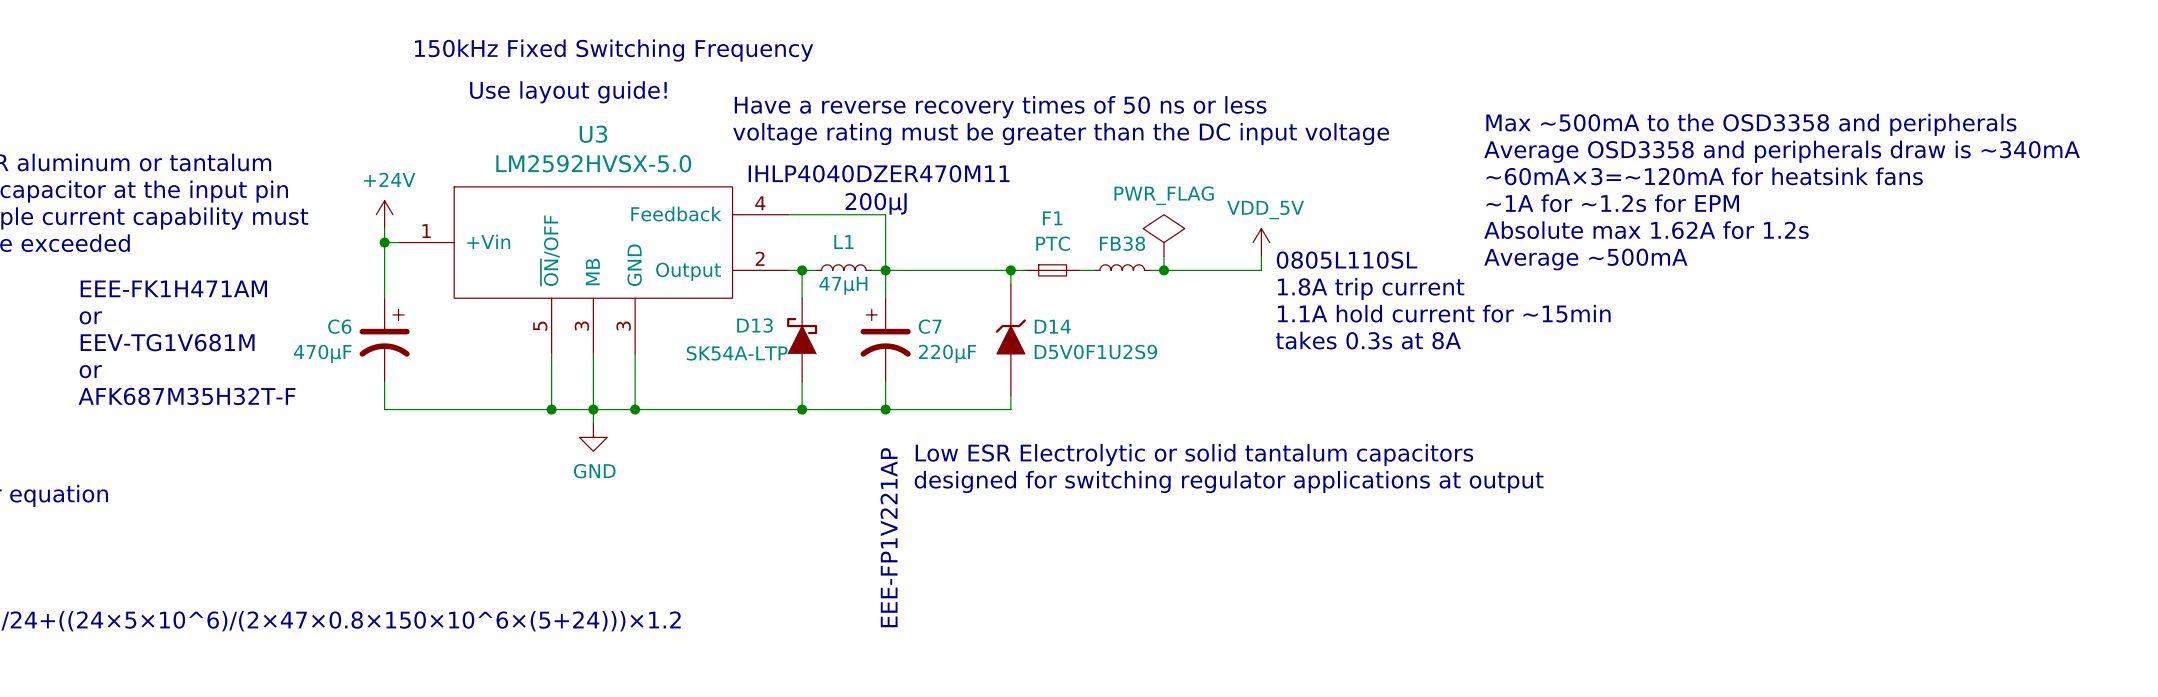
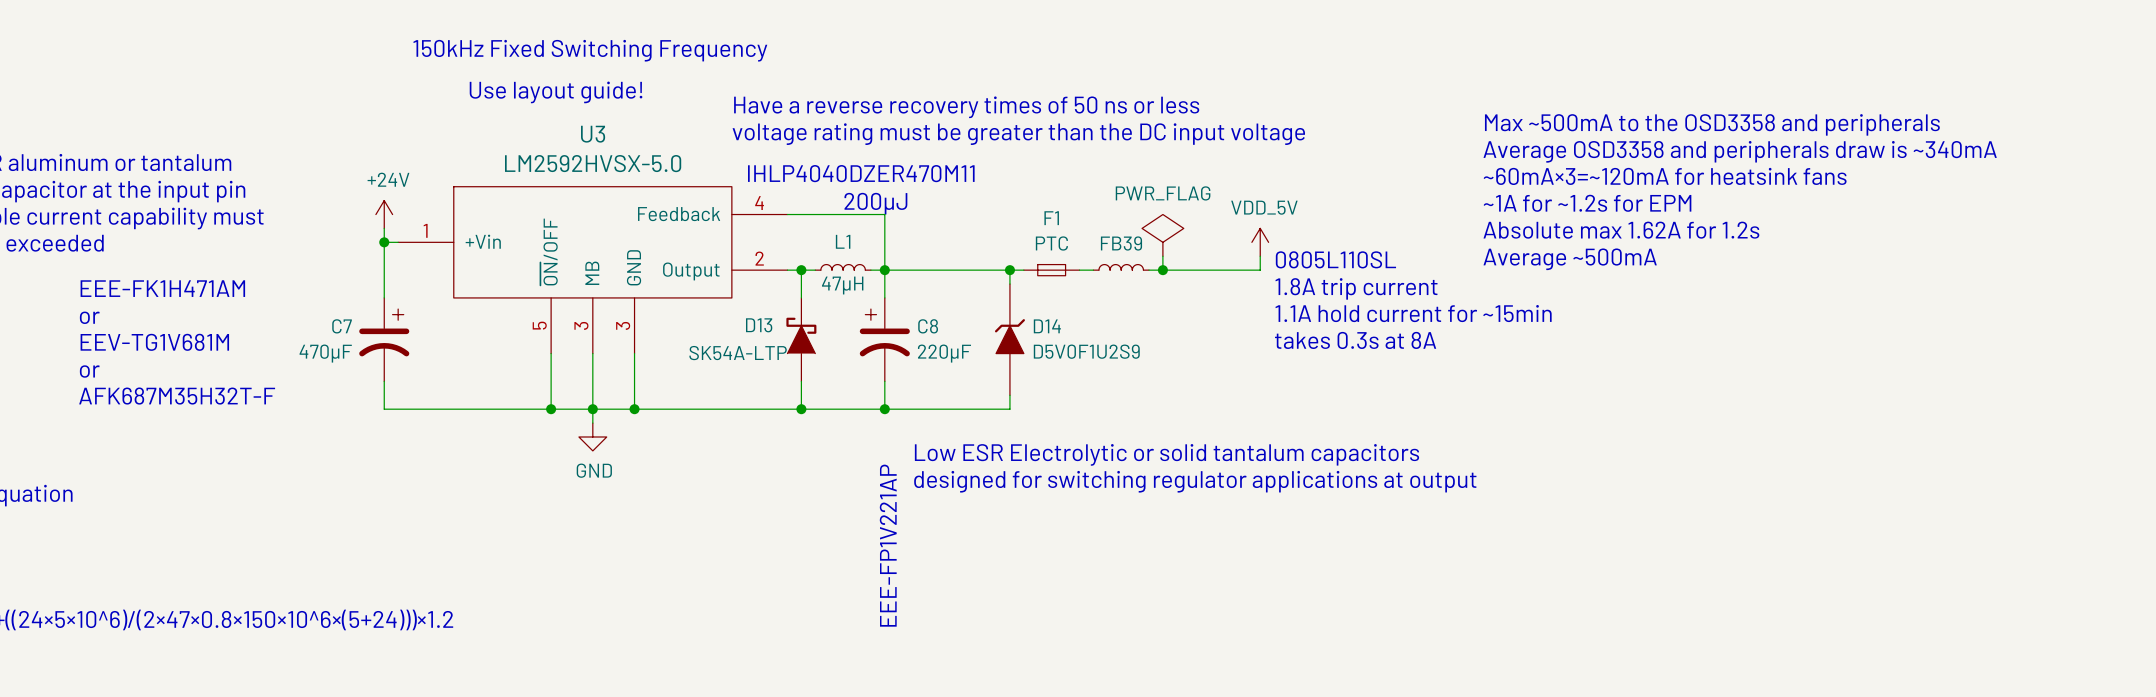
FB38 name: FB38 (1122, 243) -> FB39 (1121, 243)
C6 name: C6 (339, 326) -> C7 (342, 326)
C7 name: C7 (930, 326) -> C8 (928, 326)

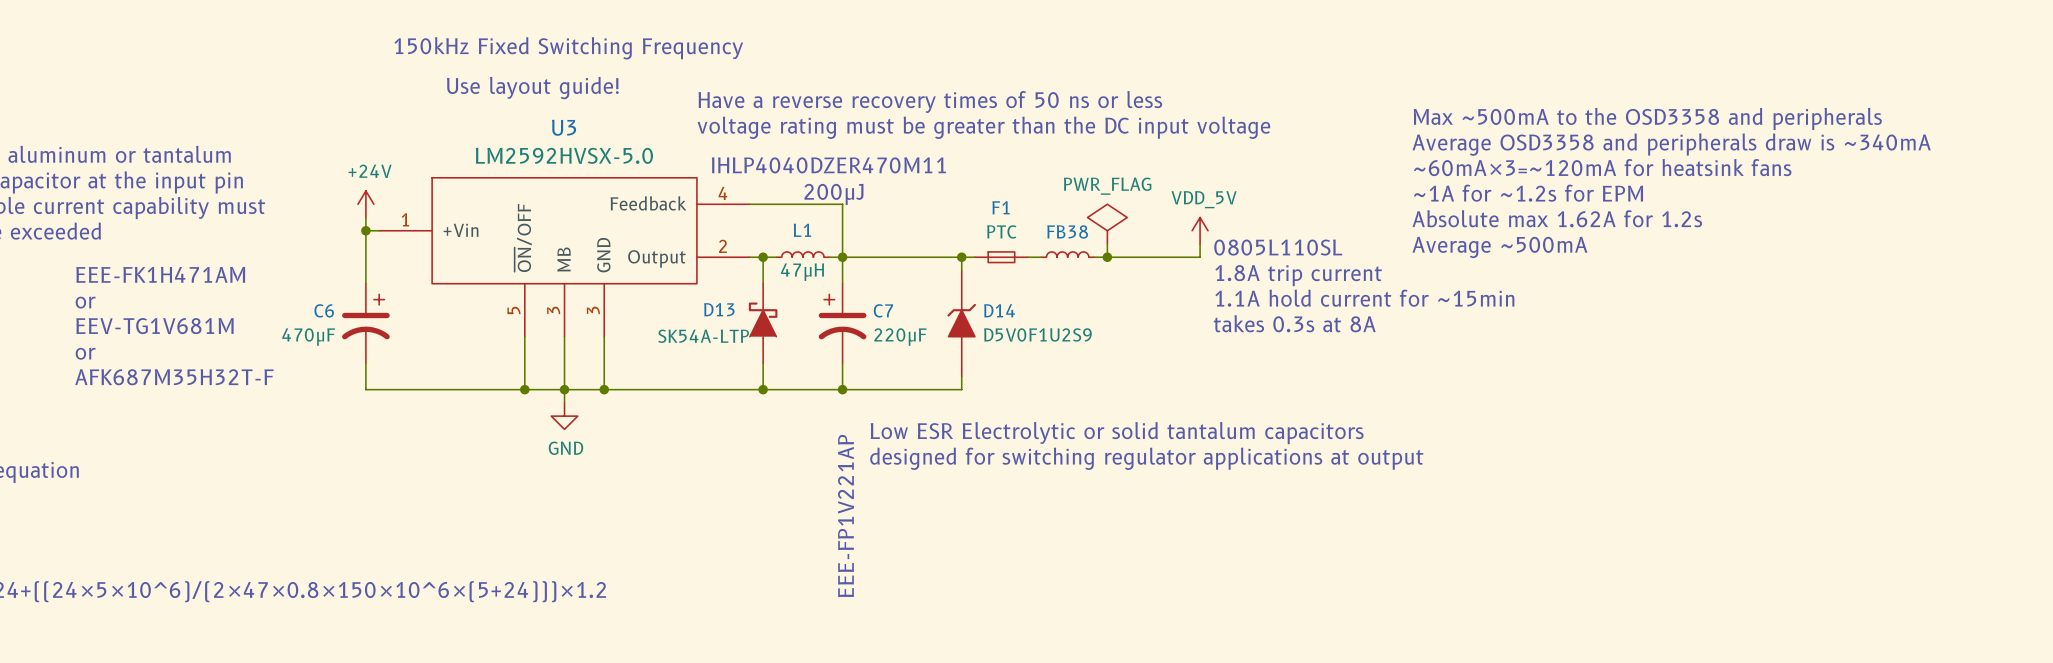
FB39 name: FB39 (1121, 243) -> FB38 (1067, 231)
C7 name: C7 (342, 326) -> C6 (324, 310)
C8 name: C8 (928, 326) -> C7 (883, 310)

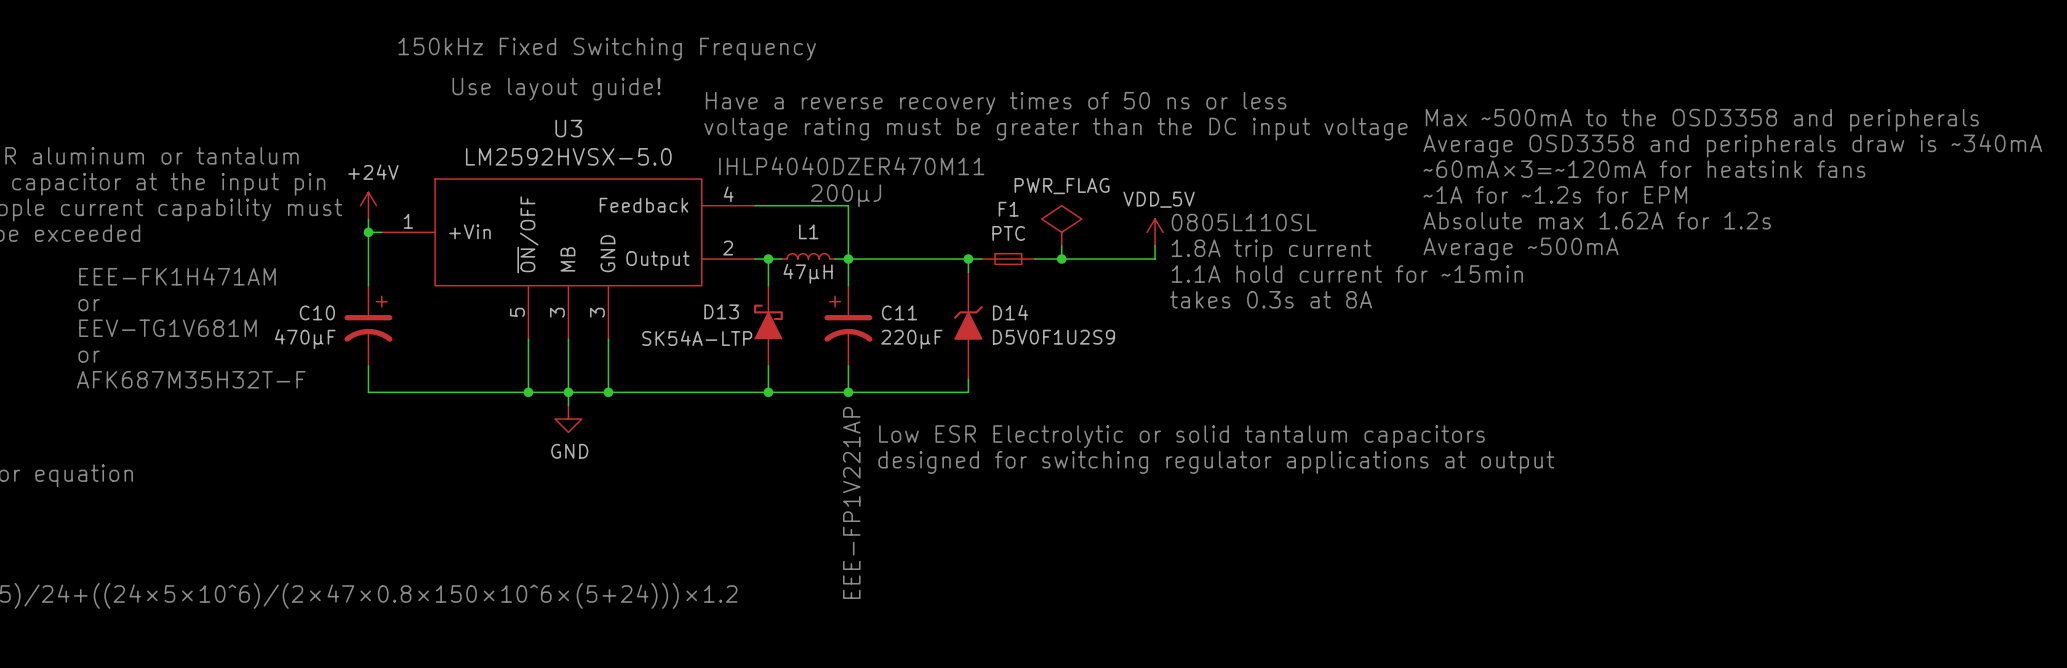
power symbol position: PWR_FLAG (1107, 224) -> PWR_FLAG (1061, 225)
power symbol position: VDD_5V (1200, 230) -> VDD_5V (1155, 232)
wire: (1107, 244) (1107, 257) -> (1061, 245) (1061, 259)
wire: (1200, 244) (1200, 257) (1147, 257) -> (1155, 245) (1155, 259)
text position: 0805L110SL (1278, 247) -> 0805L110SL (1244, 222)
FB38: (1067, 254) -> none
wire: none -> (1048, 259) (1101, 259)
junction position: (1107, 257) -> (1061, 259)
text position: 1.8A trip current (1298, 275) -> 1.8A trip current (1271, 250)
text position: 1.1A hold current for ~15min (1364, 298) -> 1.1A hold current for ~15min (1347, 274)
C6 name: C6 (324, 310) -> C10 (317, 312)
C7 name: C7 (883, 310) -> C11 (899, 312)
text position: takes 0.3s at 8A (1294, 323) -> takes 0.3s at 8A (1271, 299)

